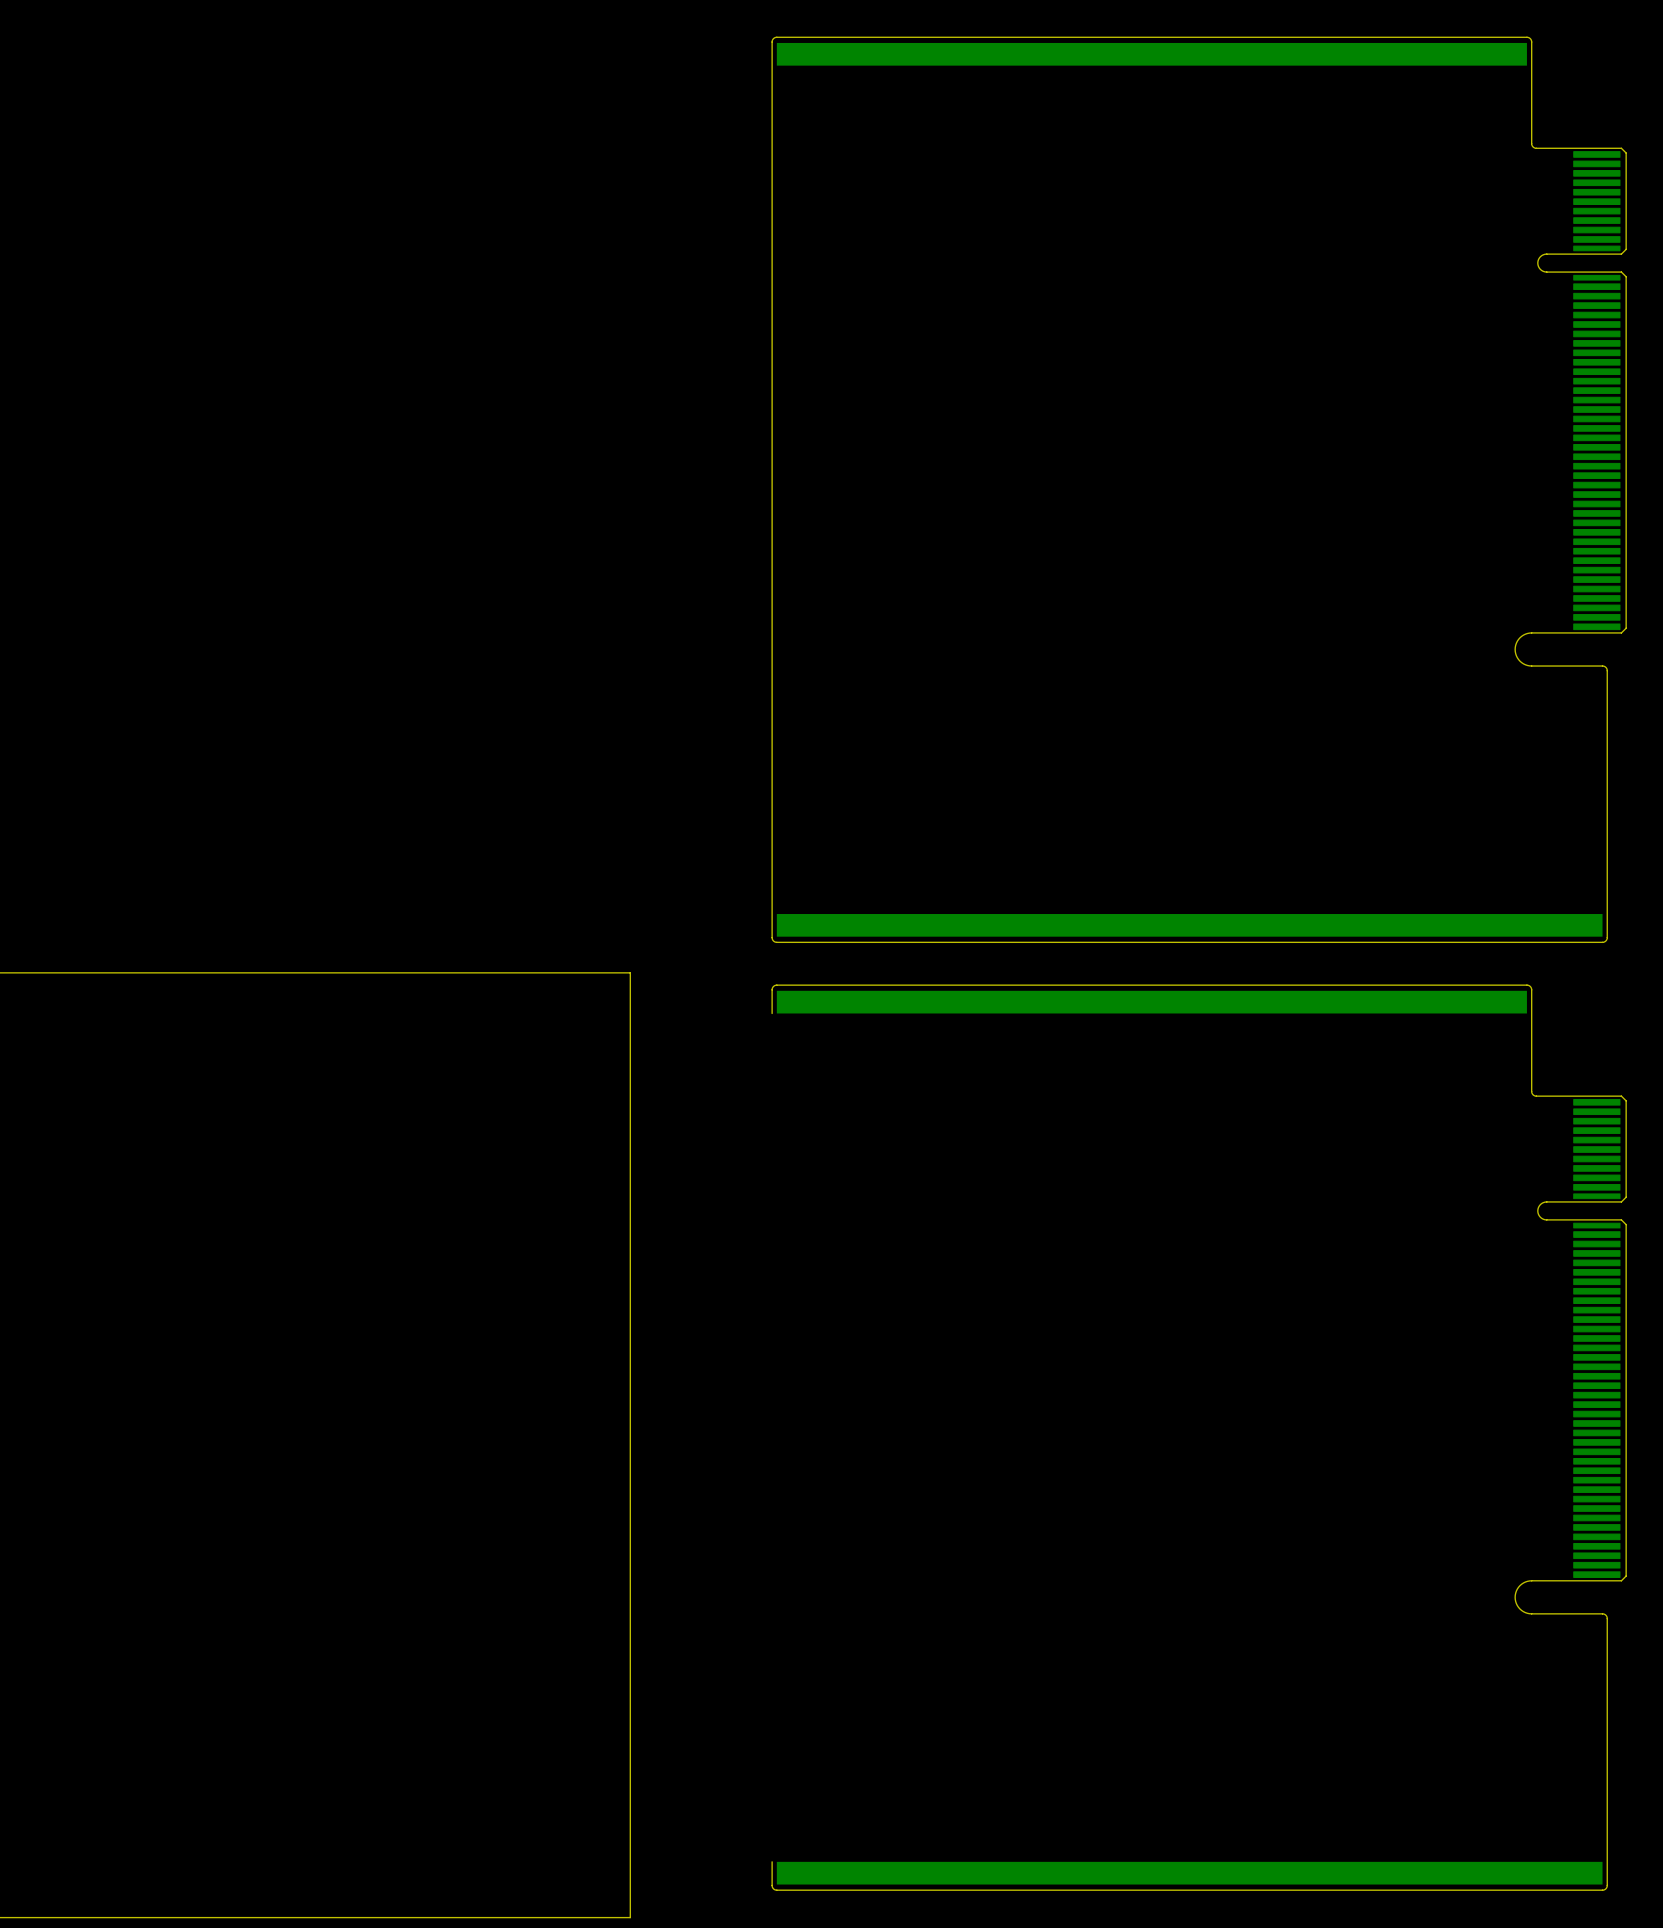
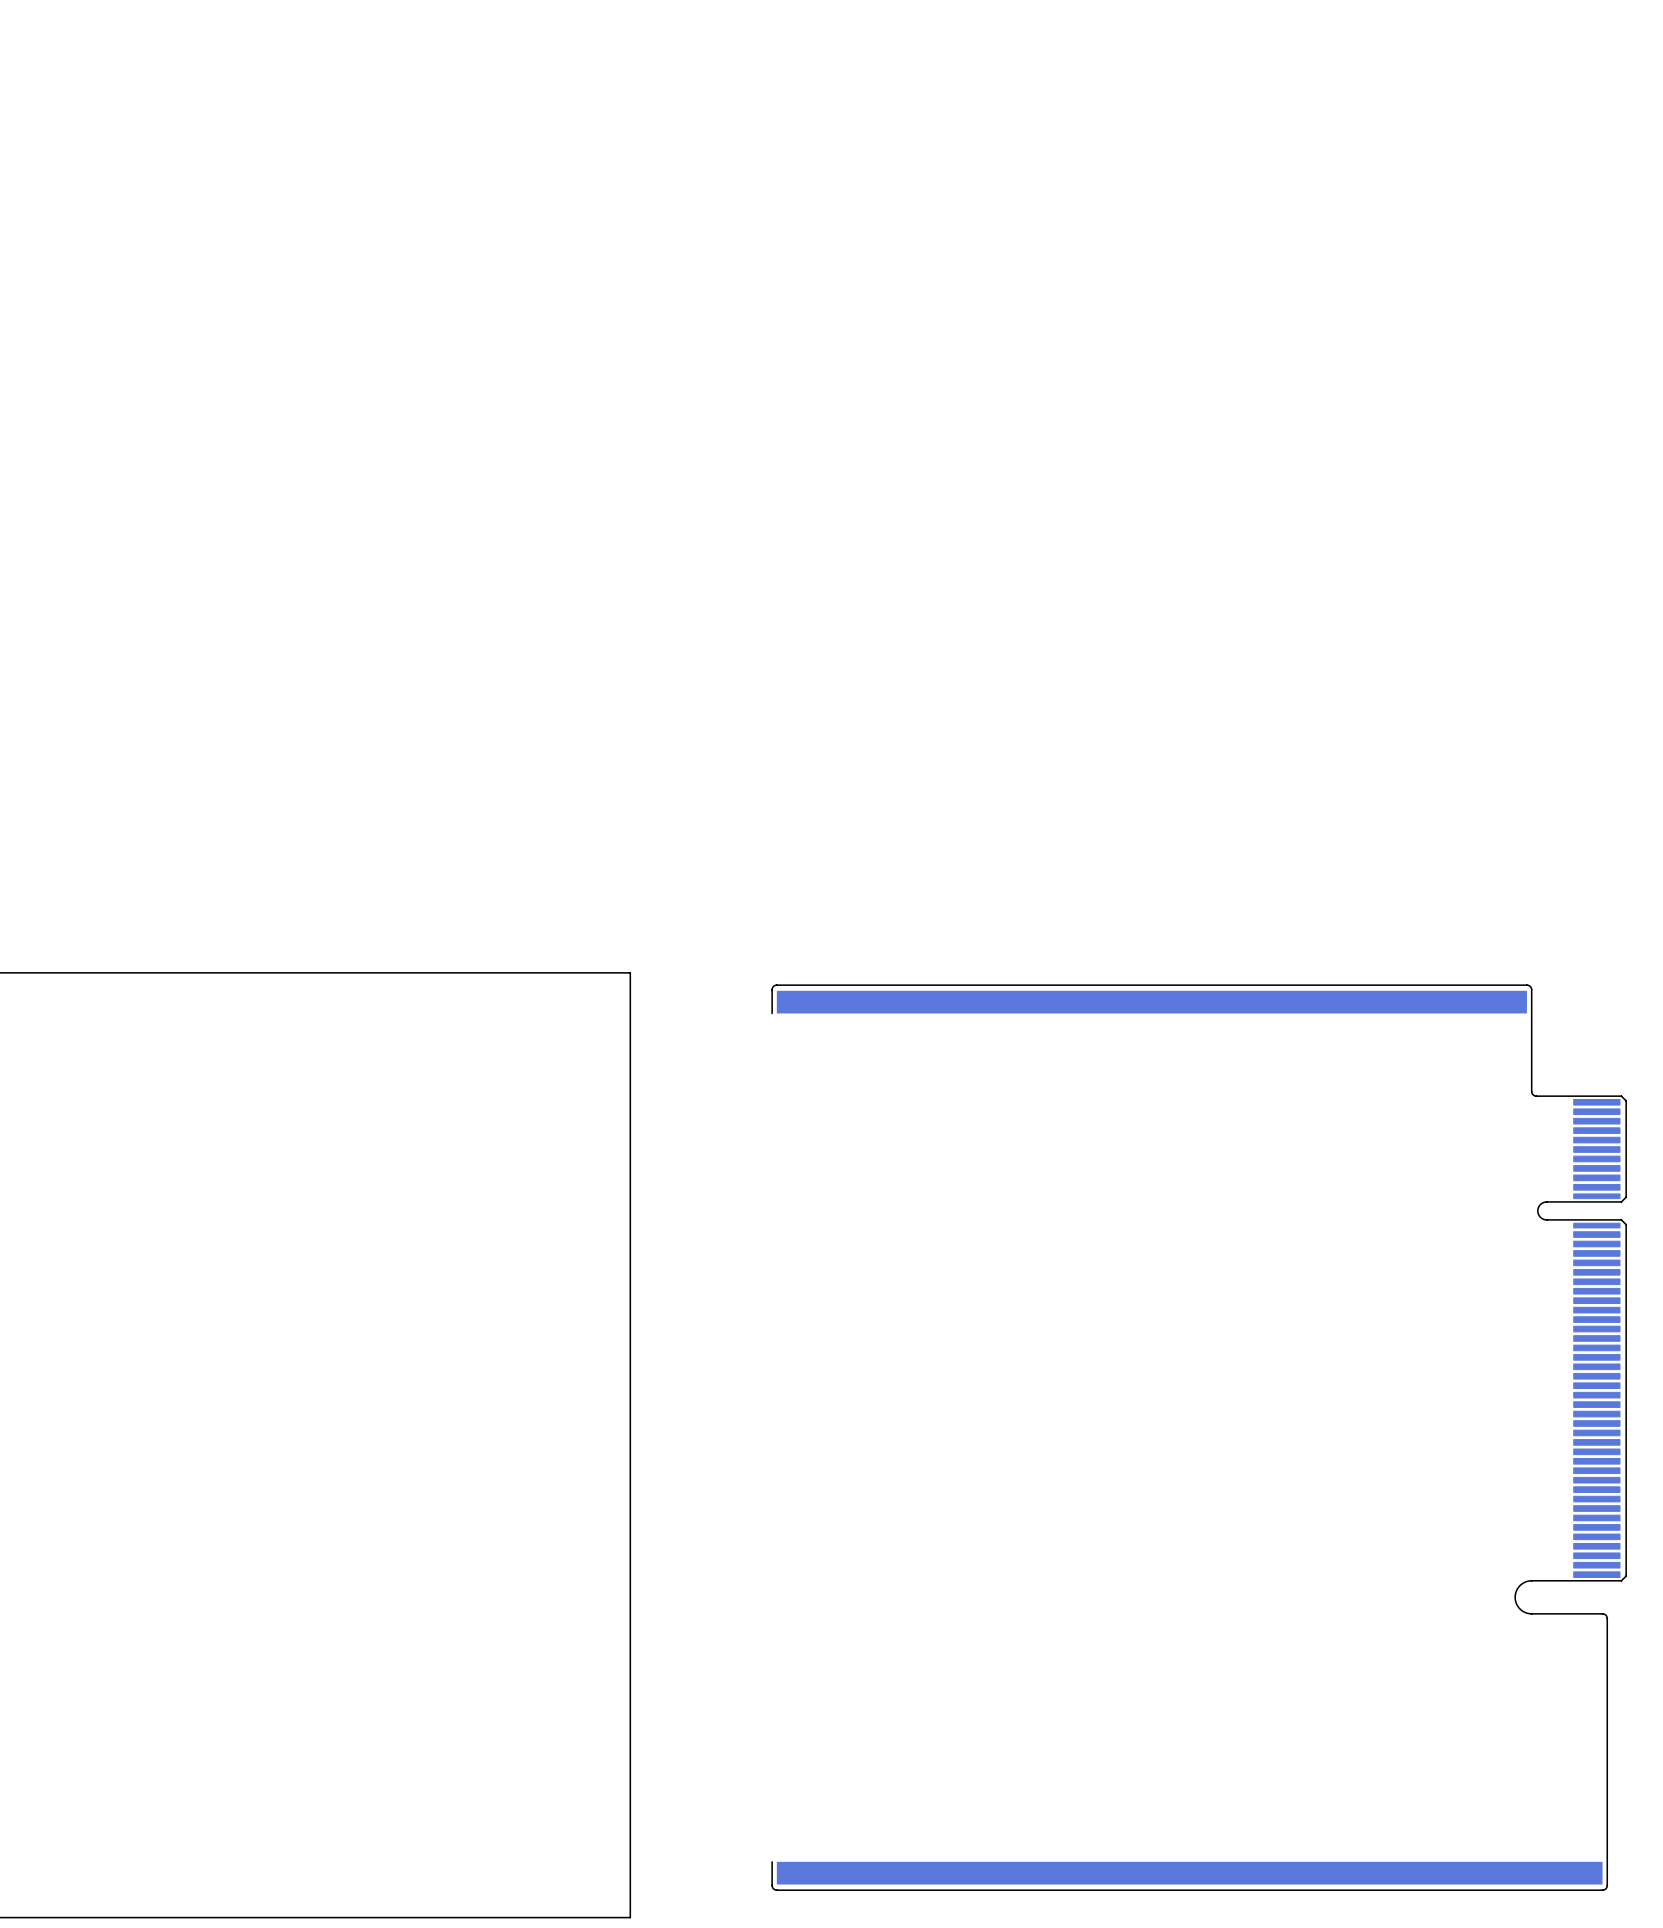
part: (1199, 489) -> none

